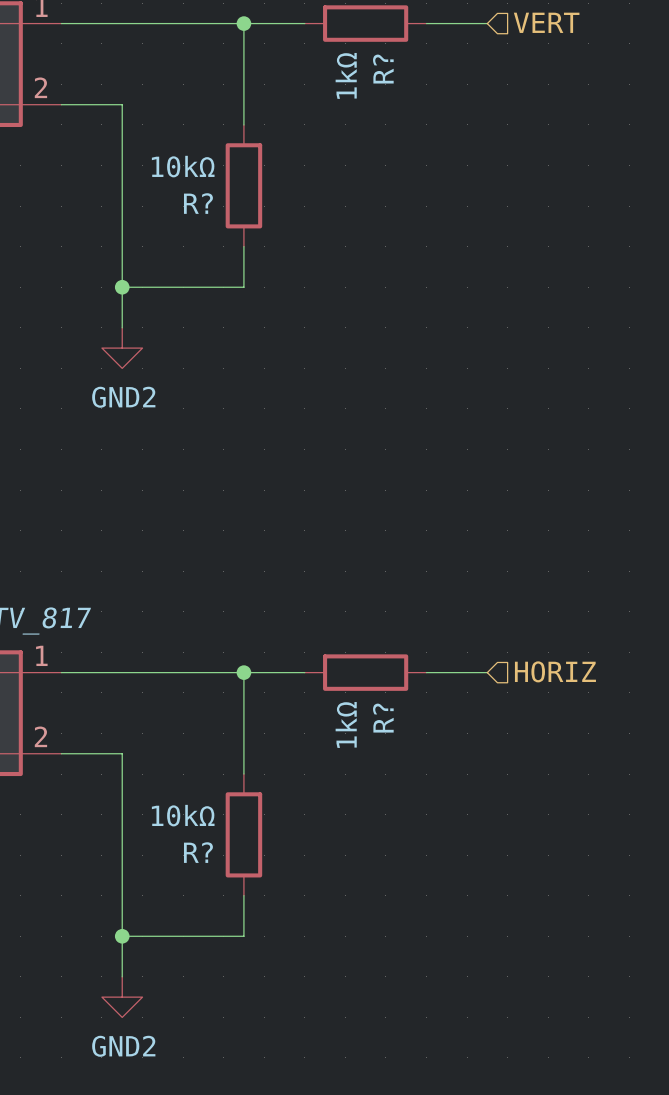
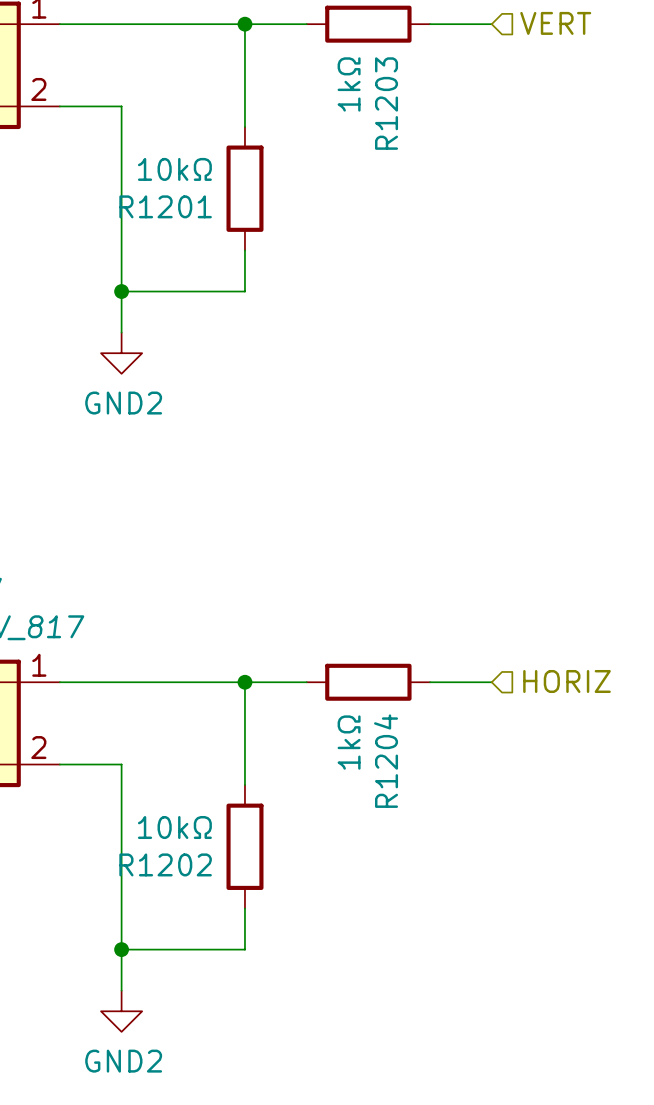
R? name: R? (383, 69) -> R1203 (386, 103)
R? name: R? (198, 203) -> R1201 (165, 206)
R? name: R? (383, 718) -> R1204 (386, 761)
R? name: R? (198, 852) -> R1202 (165, 864)

